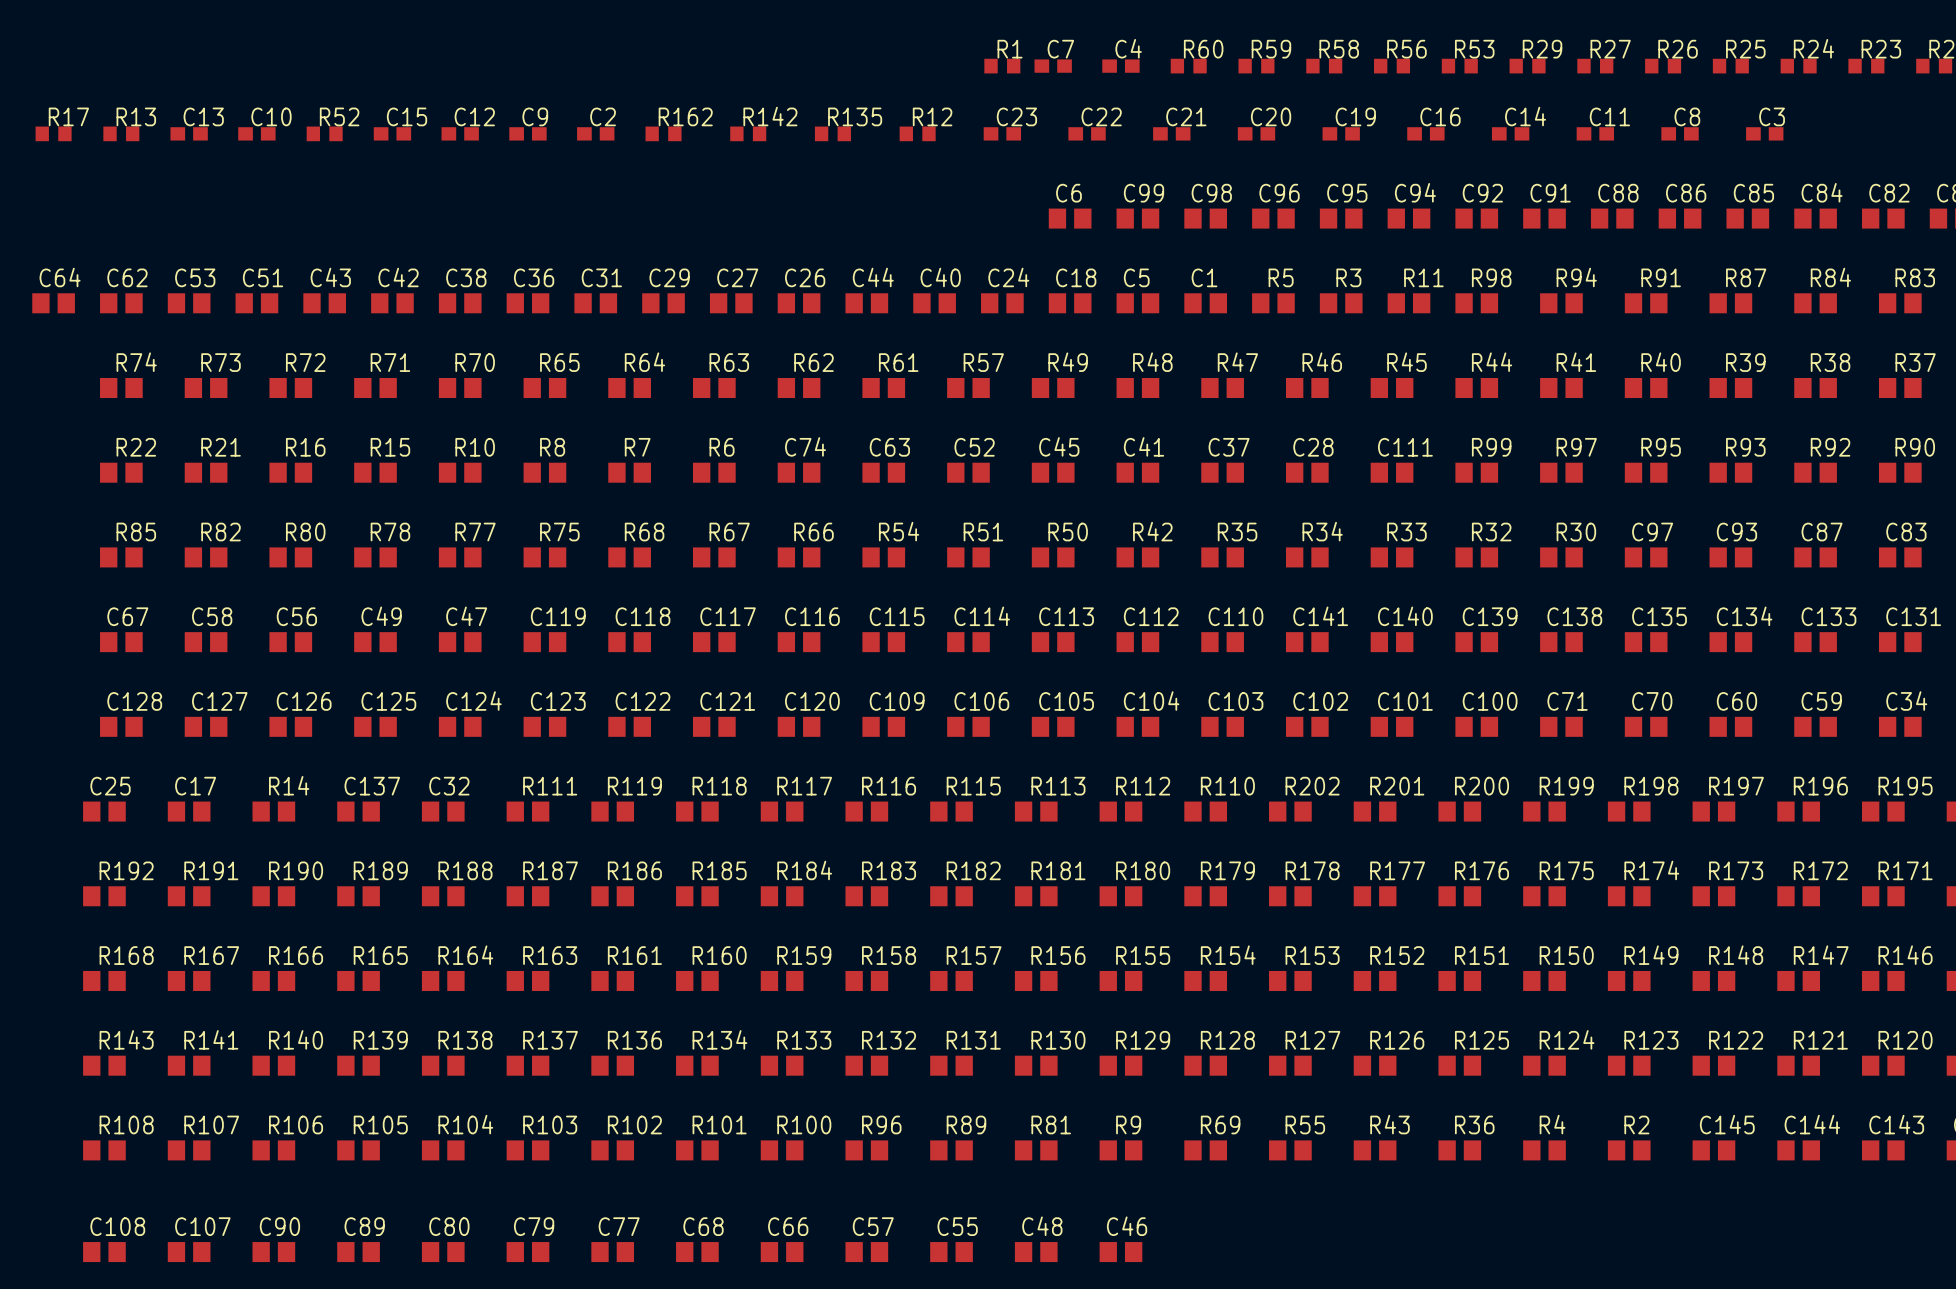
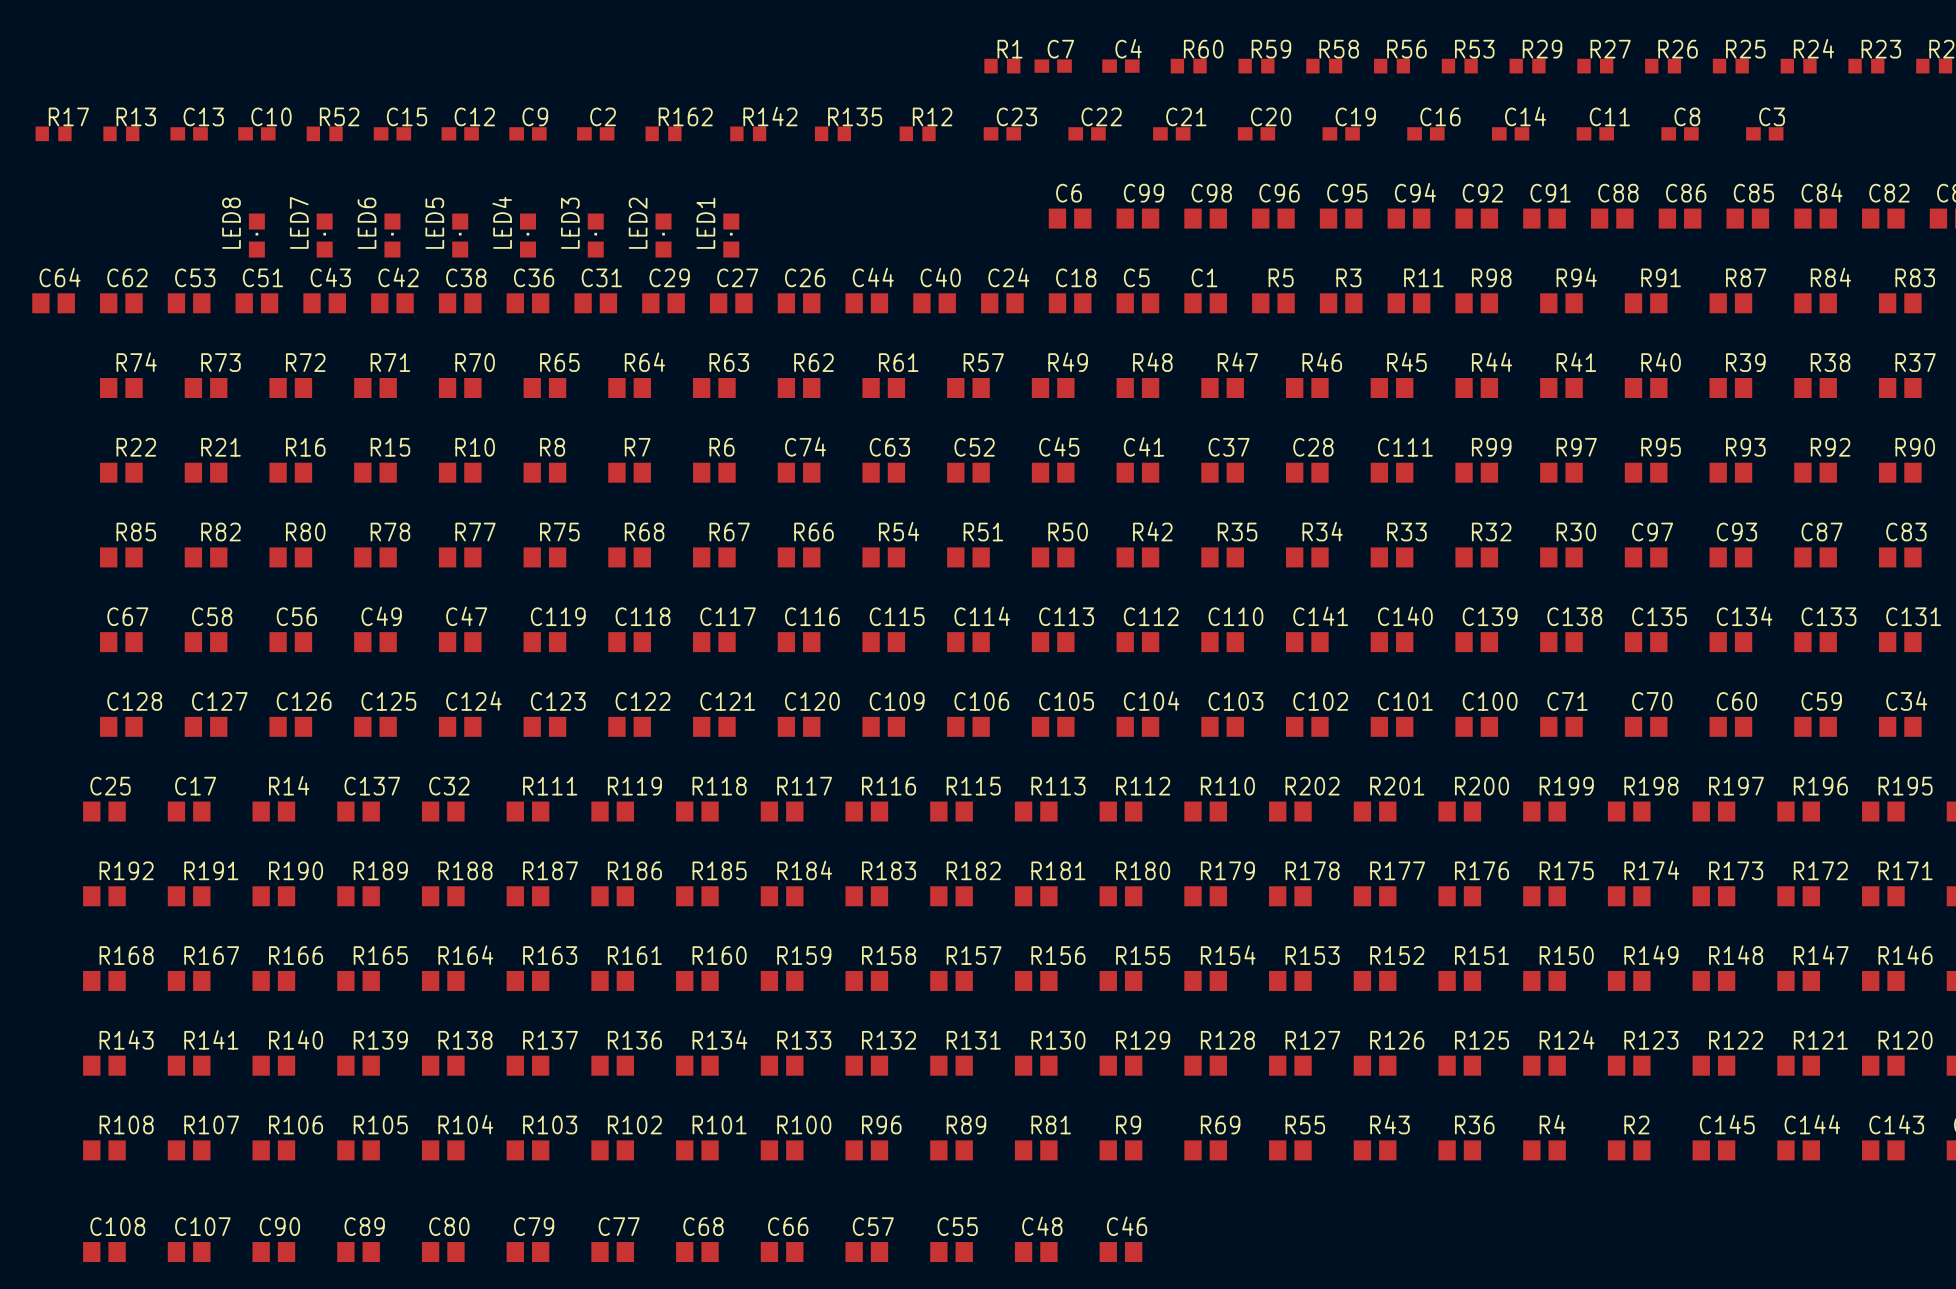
LED8: none -> (256, 235)
LED7: none -> (324, 235)
LED6: none -> (392, 235)
LED5: none -> (460, 235)
LED4: none -> (527, 235)
LED3: none -> (595, 235)
LED2: none -> (663, 235)
LED1: none -> (731, 235)

